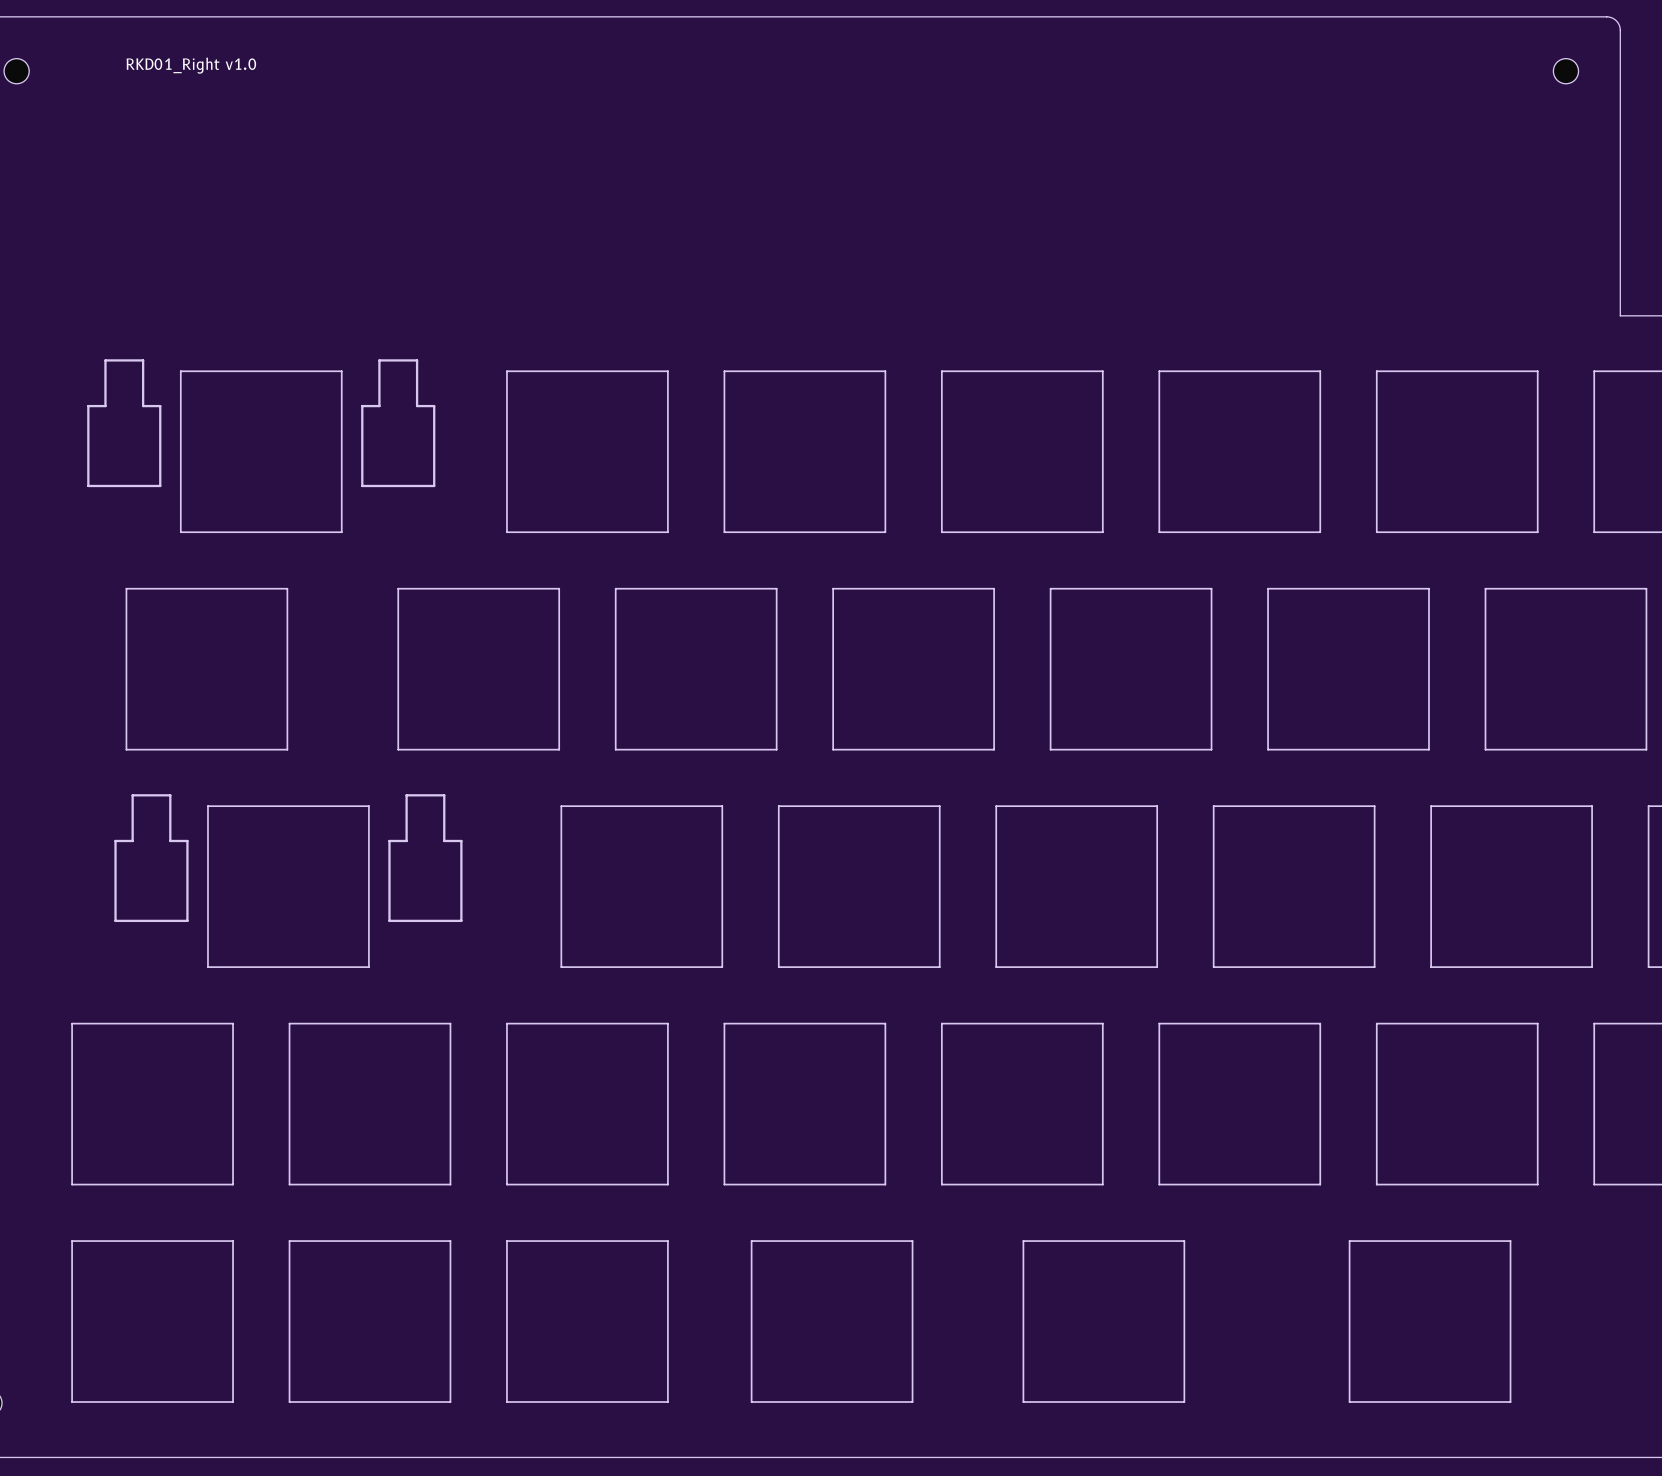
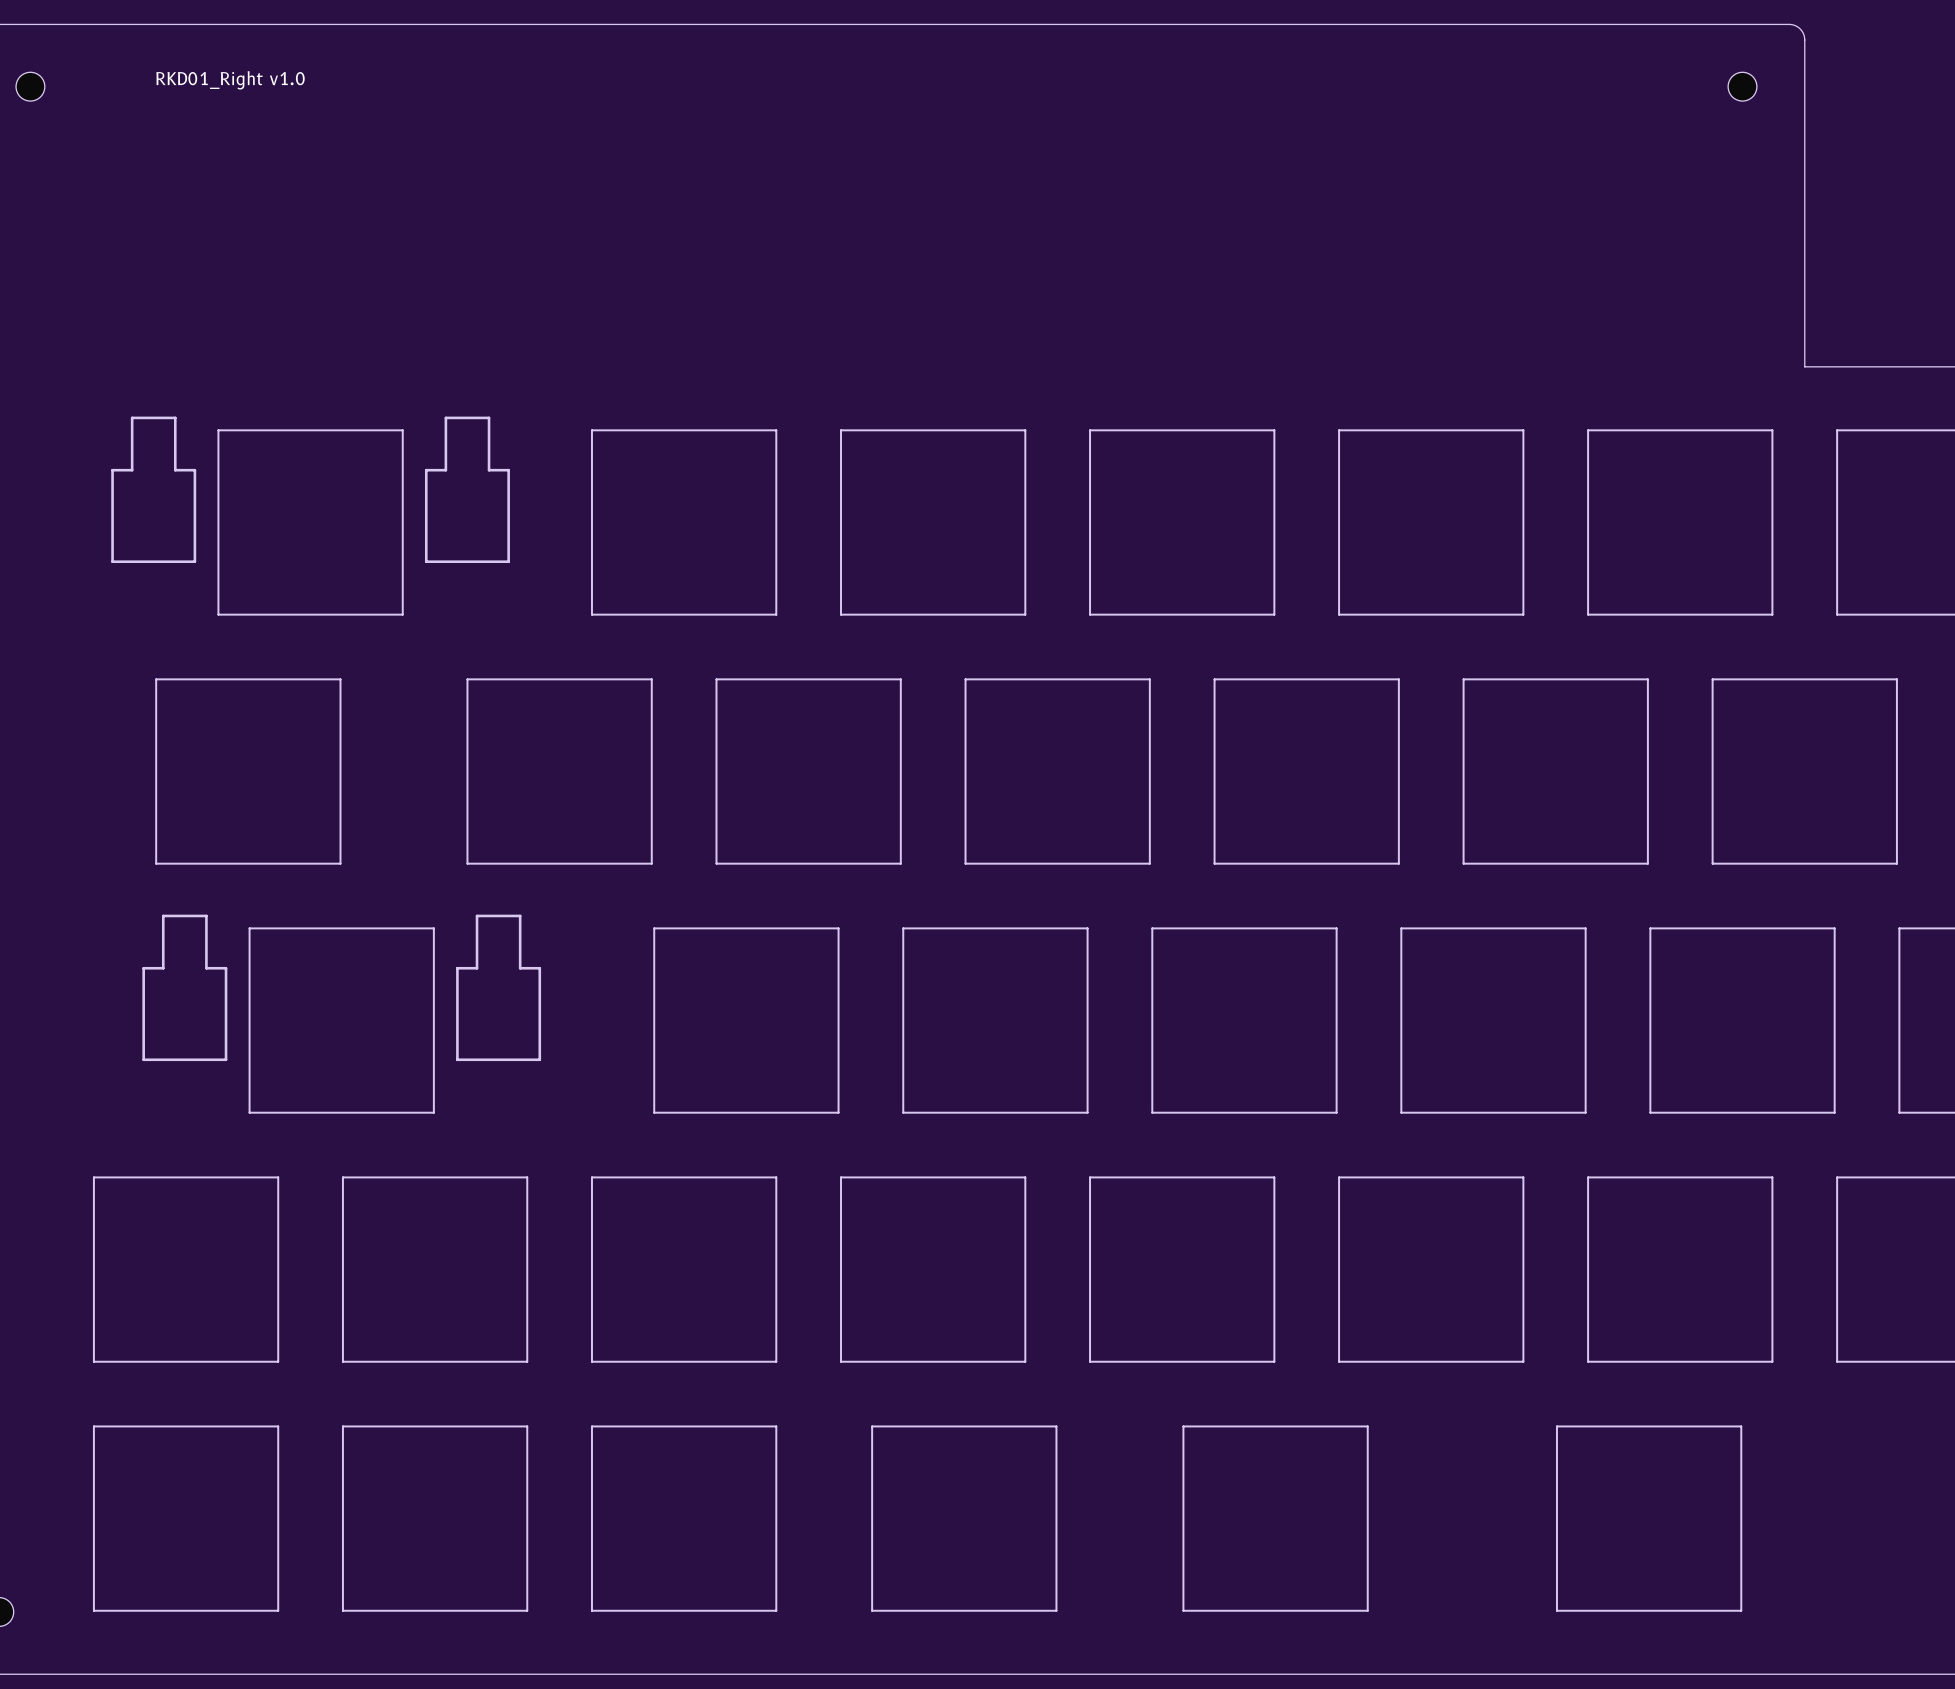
board edge: (1552, 16) (1608, 16) (1616, 20) (1619, 27) (1620, 315) -> (1789, 24) (1800, 28) (1804, 39) (1804, 366) (1867, 366)
part position: (1565, 71) -> (1742, 86)

